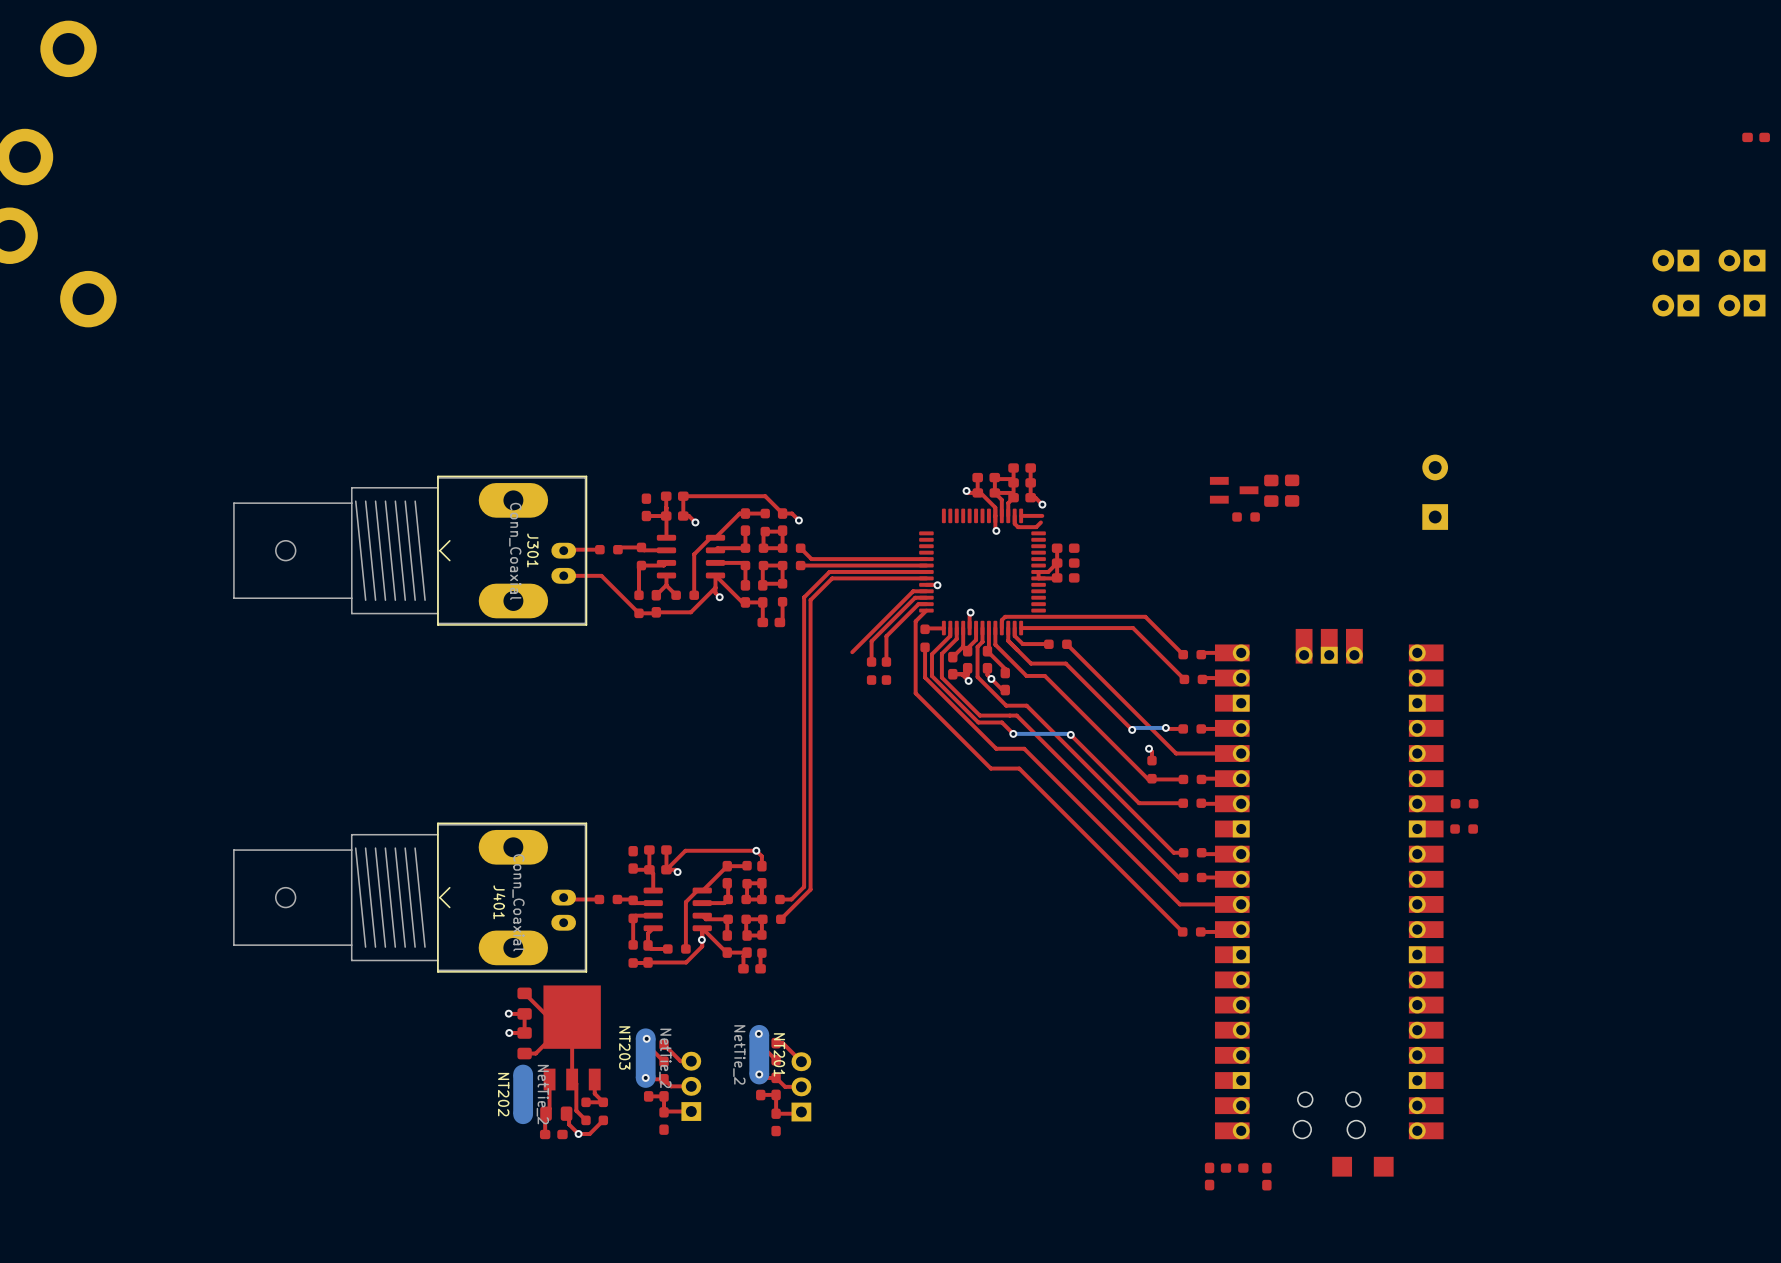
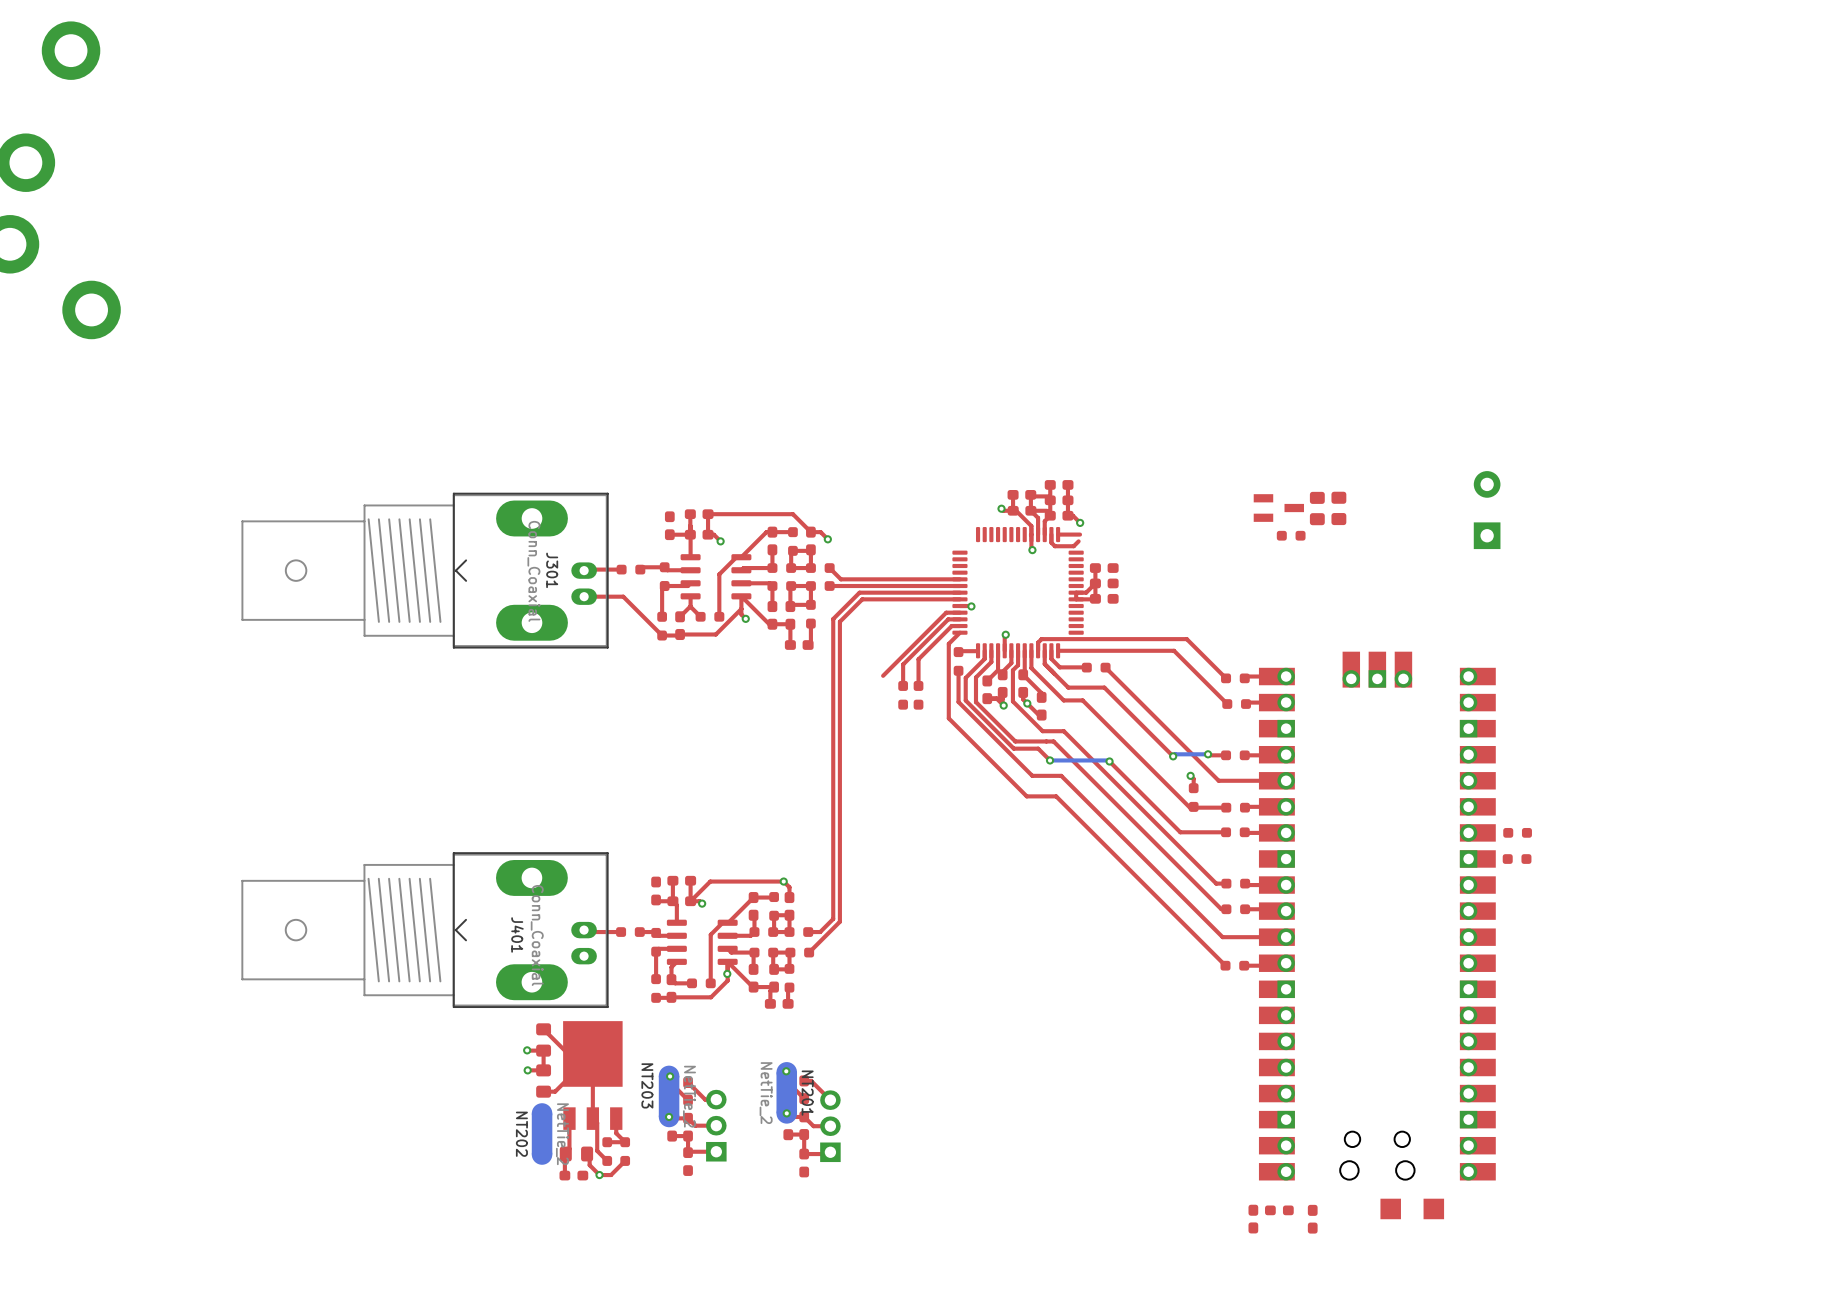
part: (1756, 137) -> none
part: (1675, 260) -> none
part: (1742, 260) -> none
part: (1675, 305) -> none
part: (1742, 305) -> none

